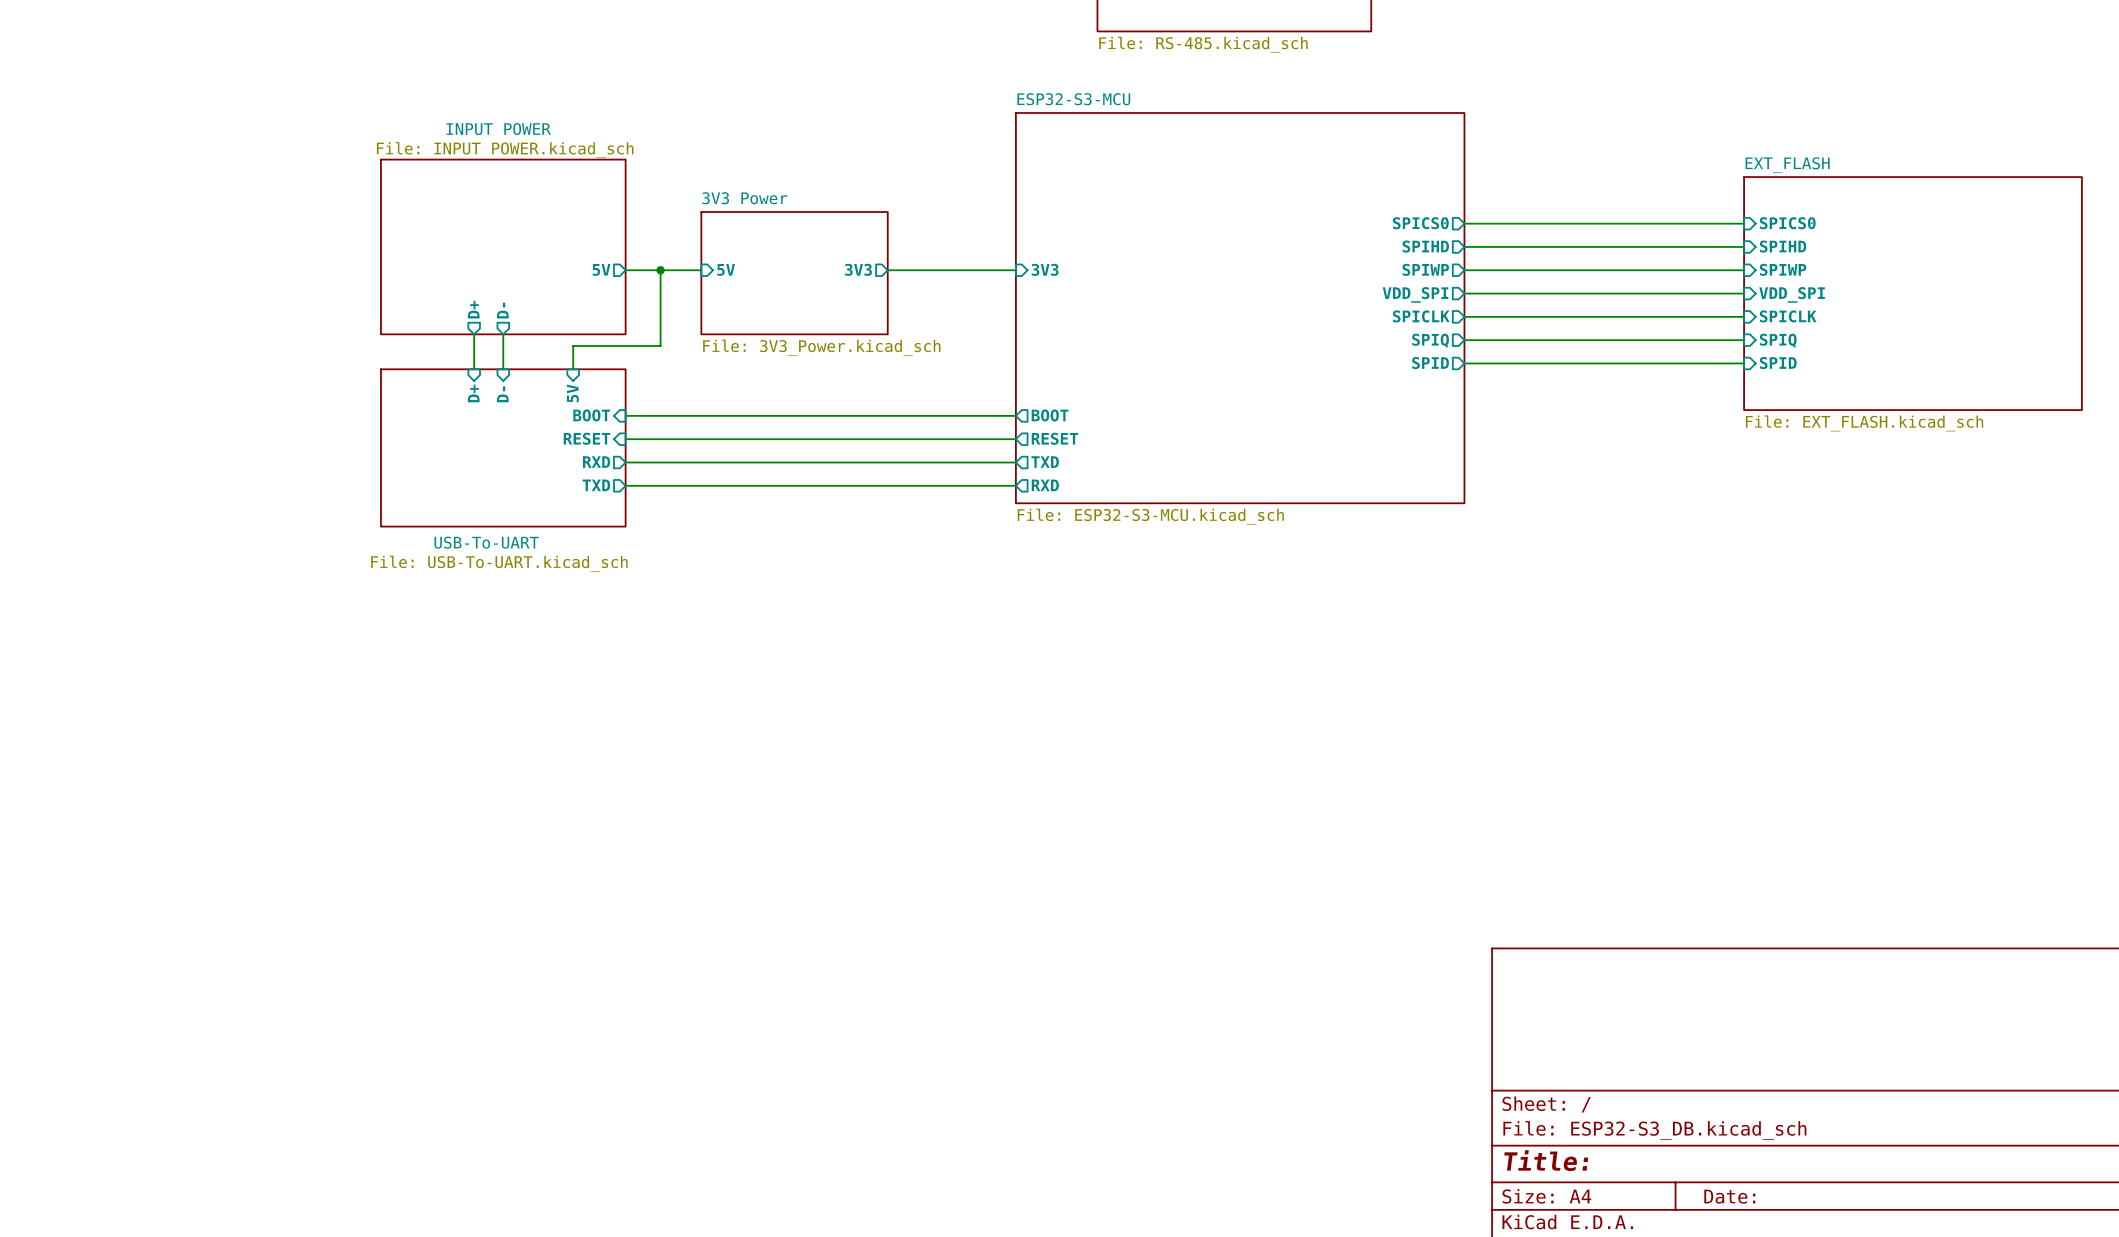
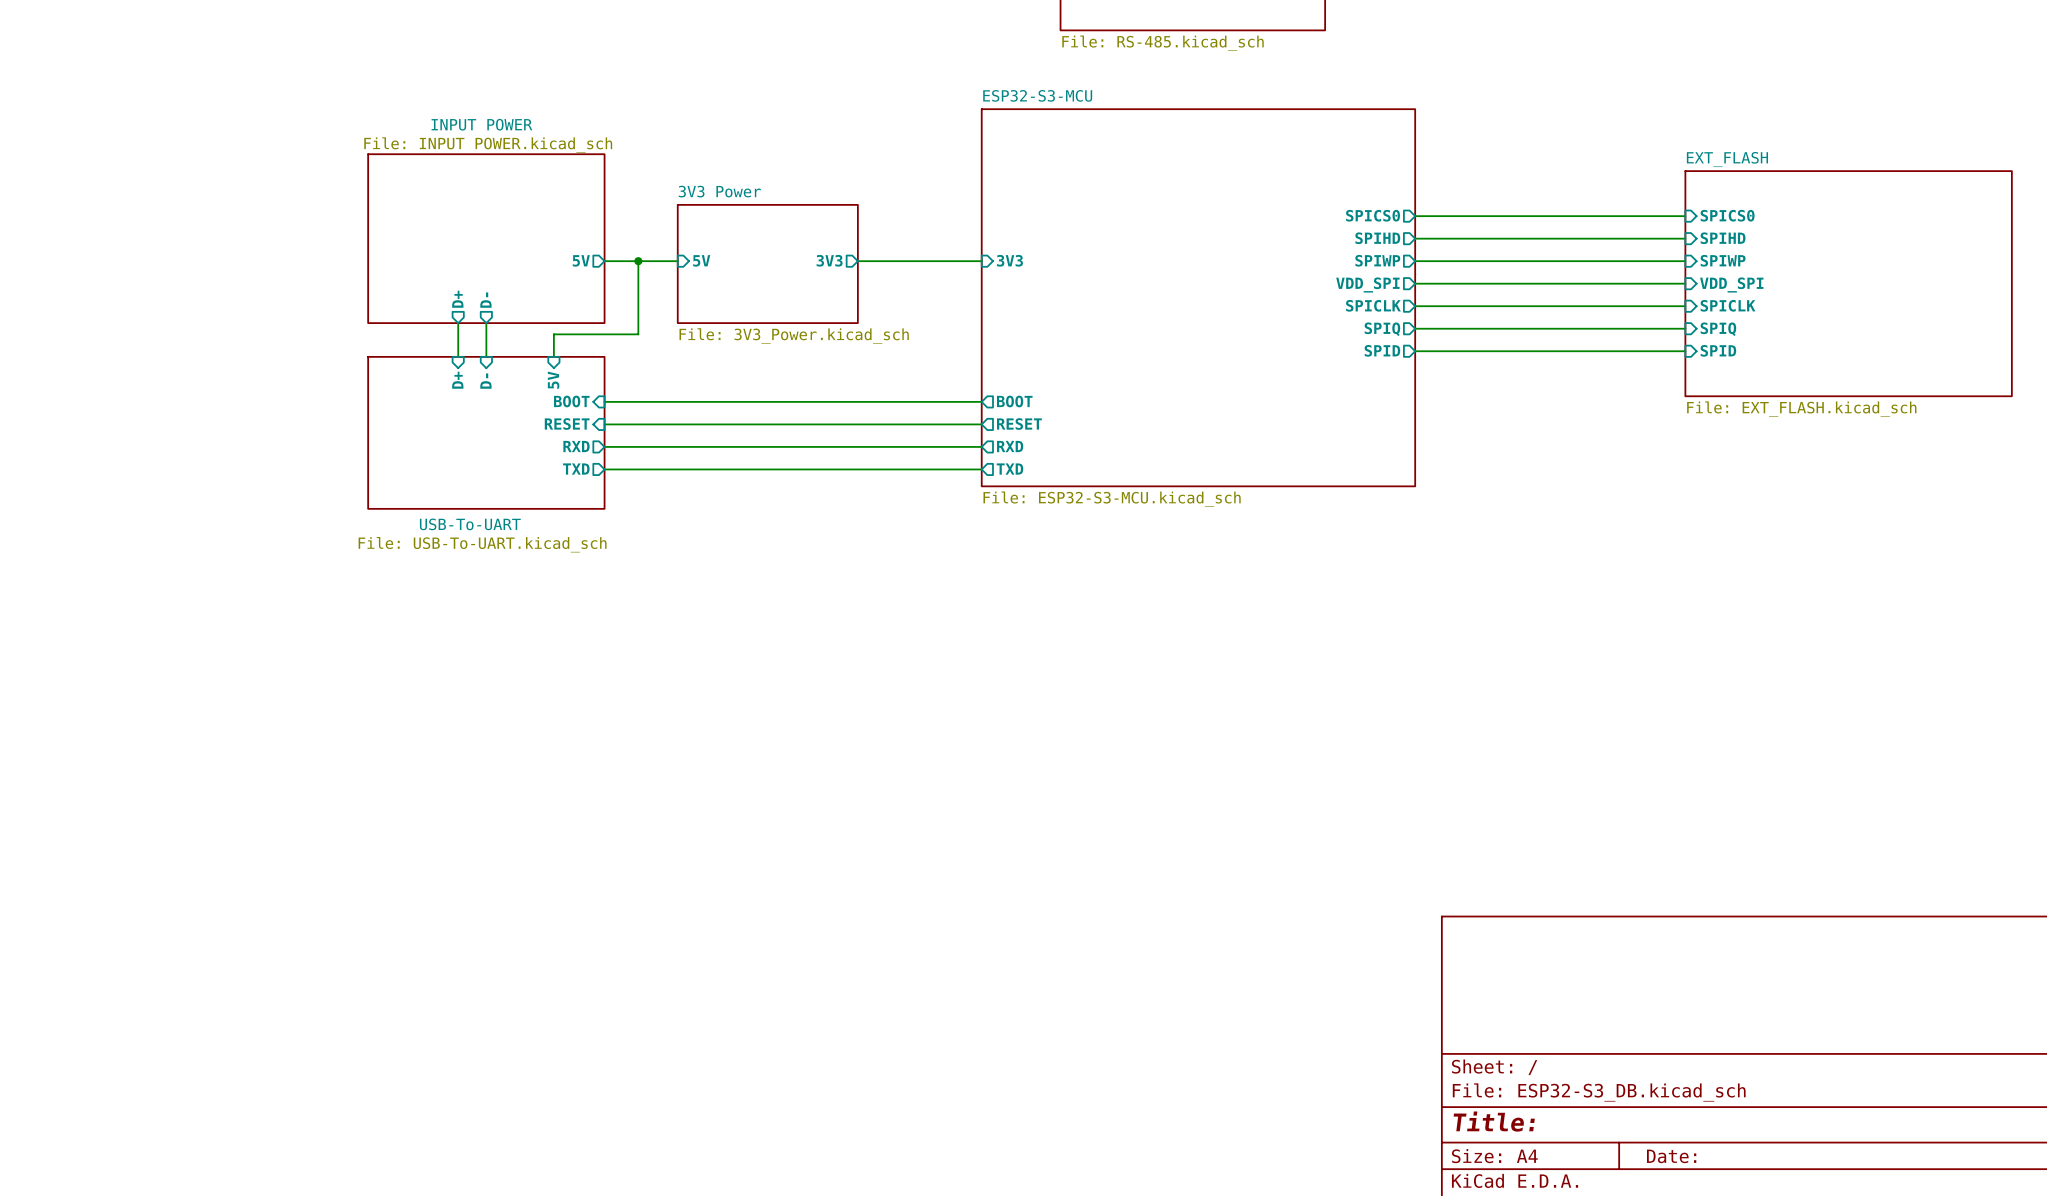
sheet pin: TXD (1045, 462) -> RXD (1010, 446)
sheet pin: RXD (1045, 485) -> TXD (1009, 469)

